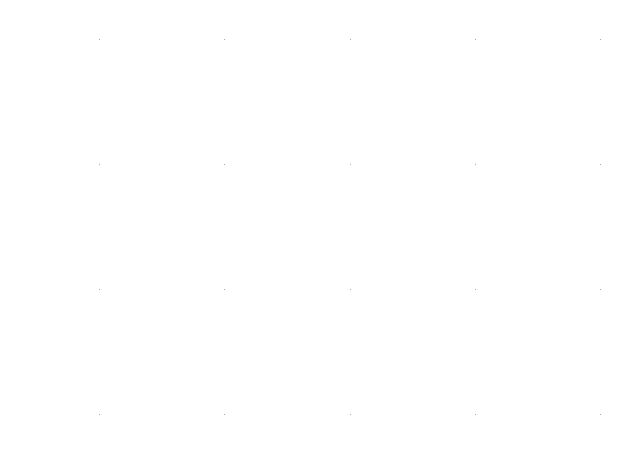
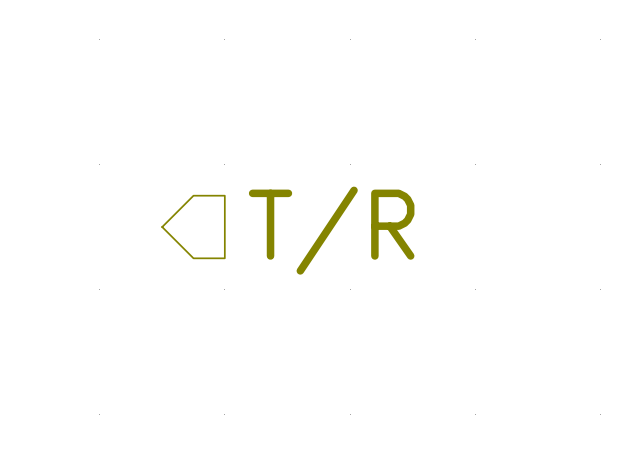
hierarchical label: none -> T/R (331, 230)

